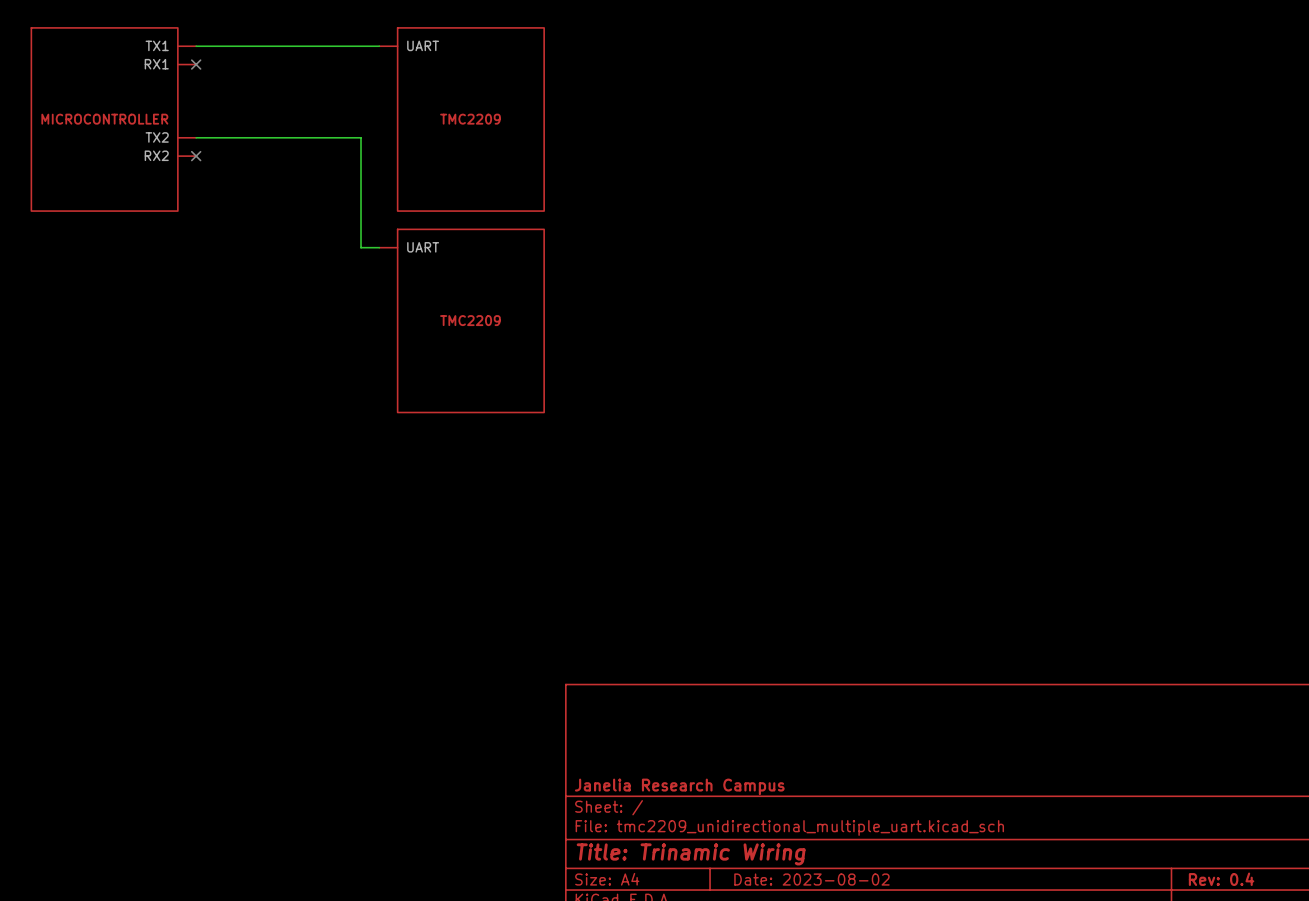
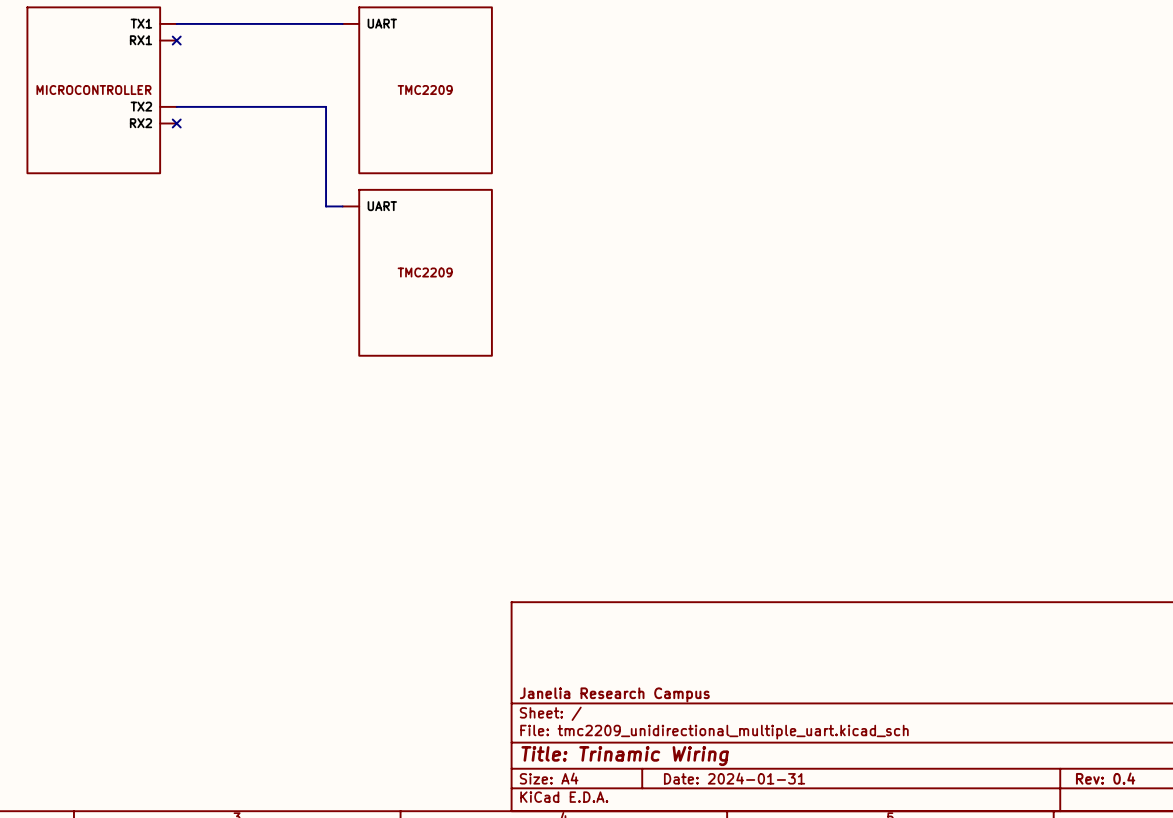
title block: Date: 2023-08-02 (811, 879) -> Date: 2024-01-31 (734, 778)

